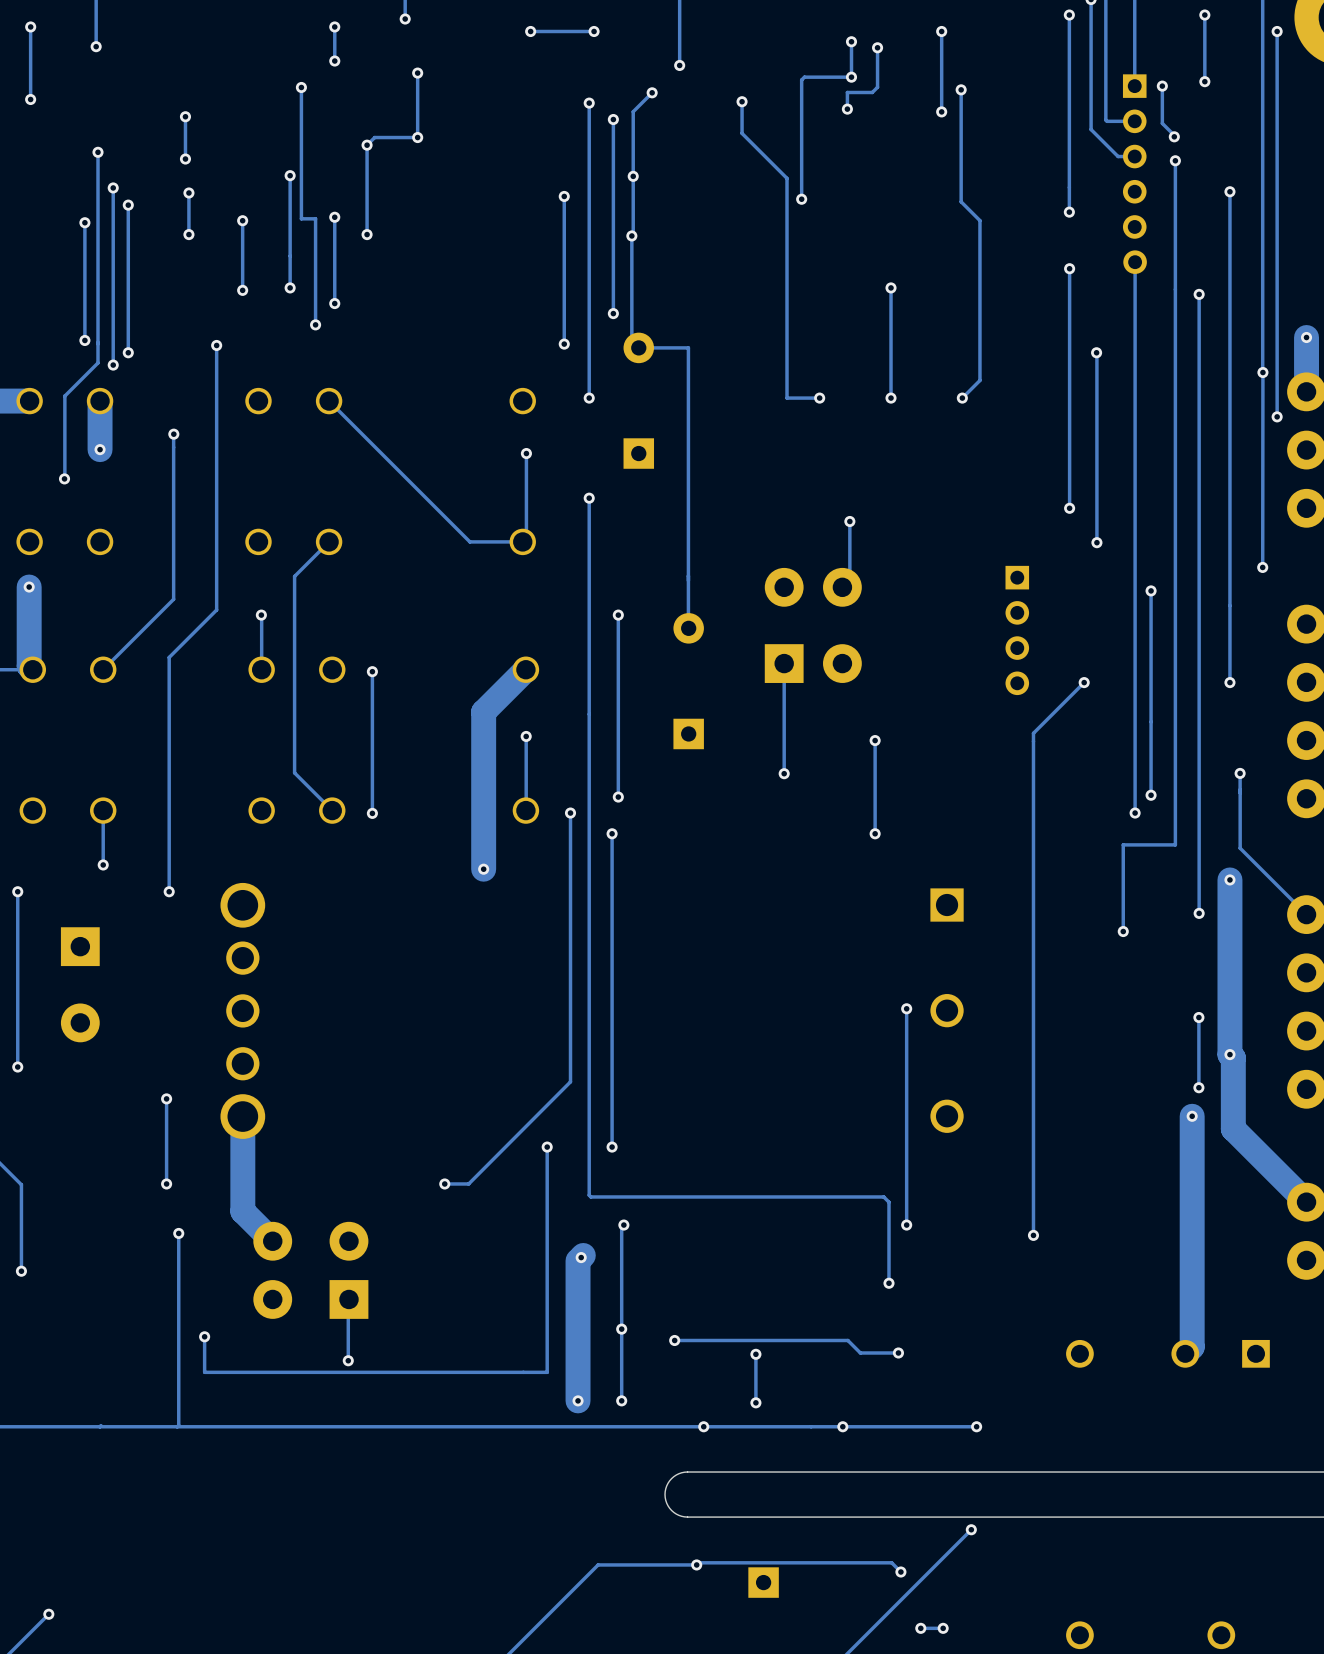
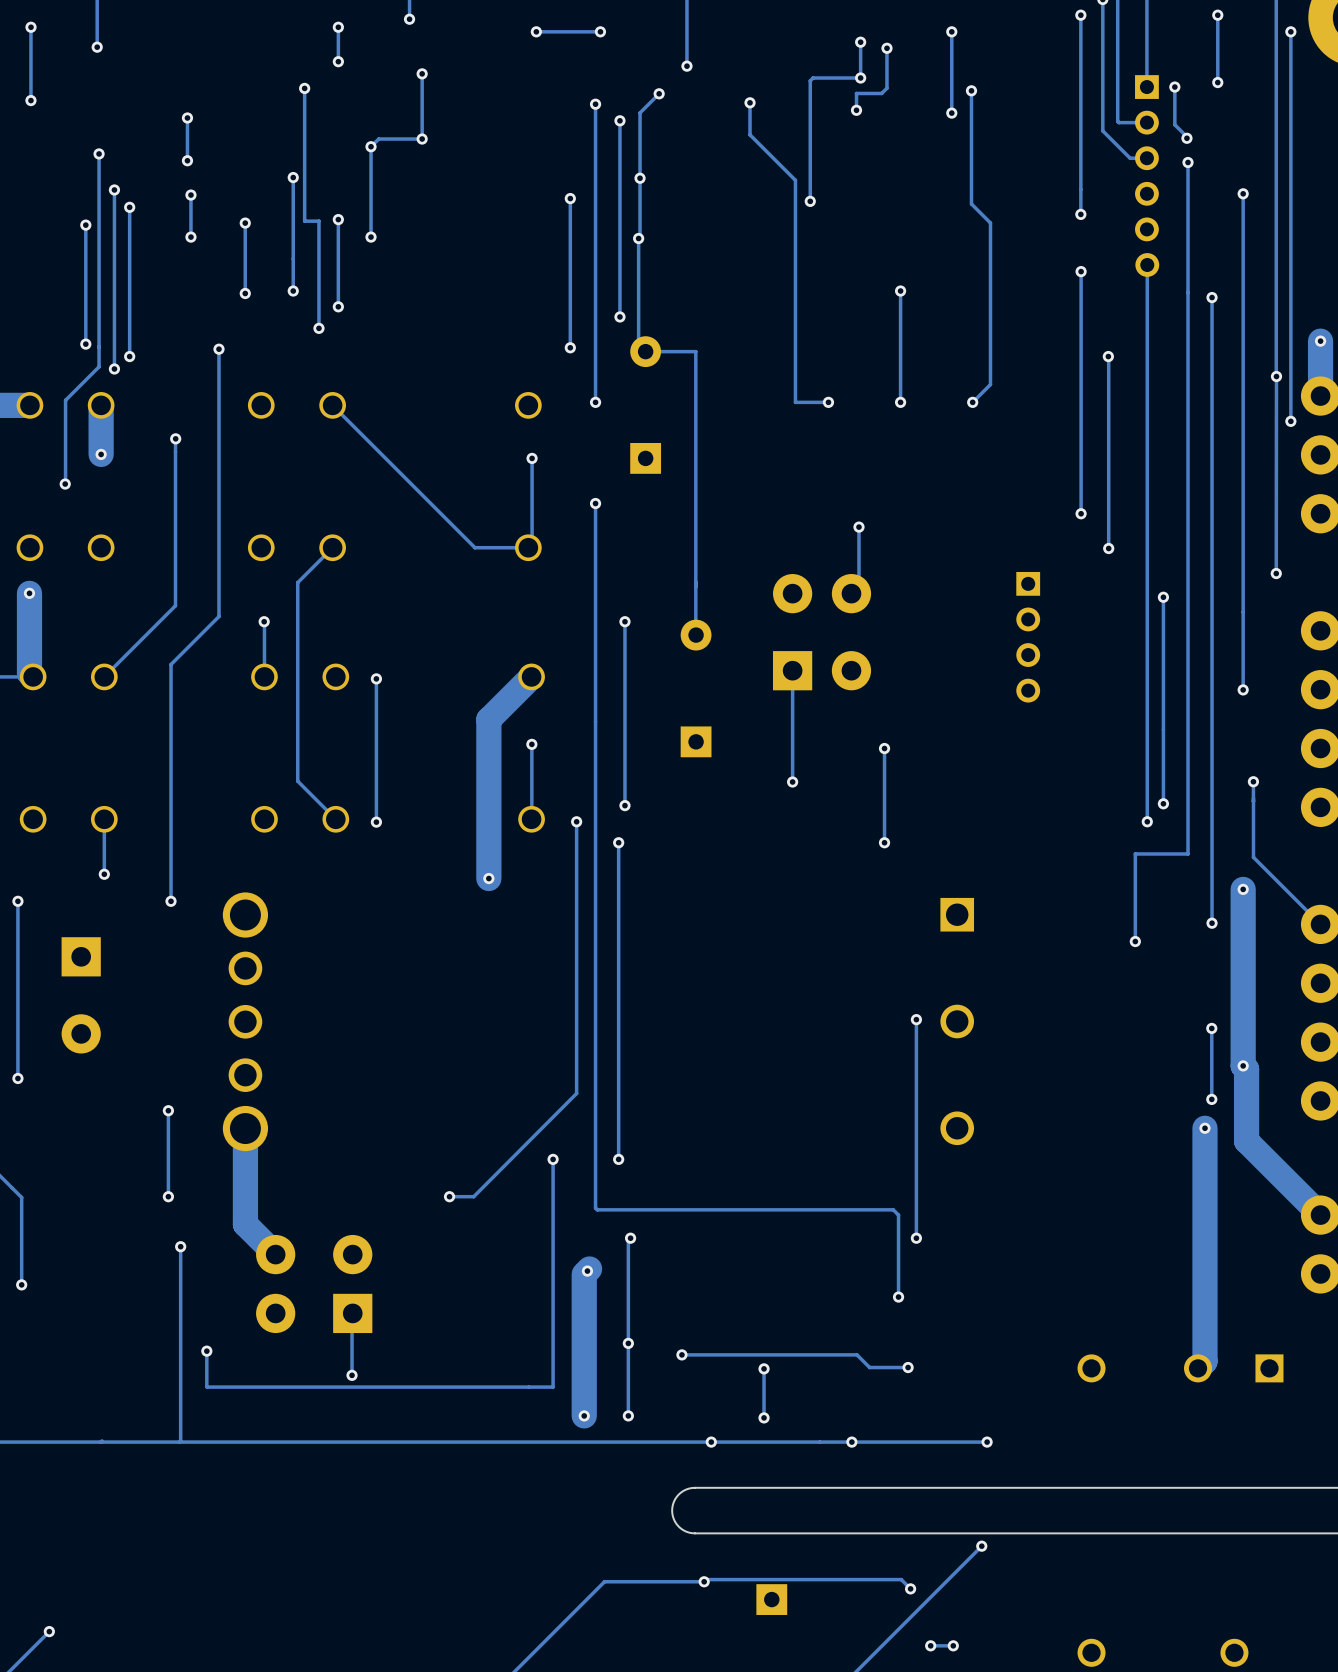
track: (1084, 682) (1033, 733) (1033, 1235) -> none
via: (1084, 682) -> none
via: (1033, 1235) -> none

